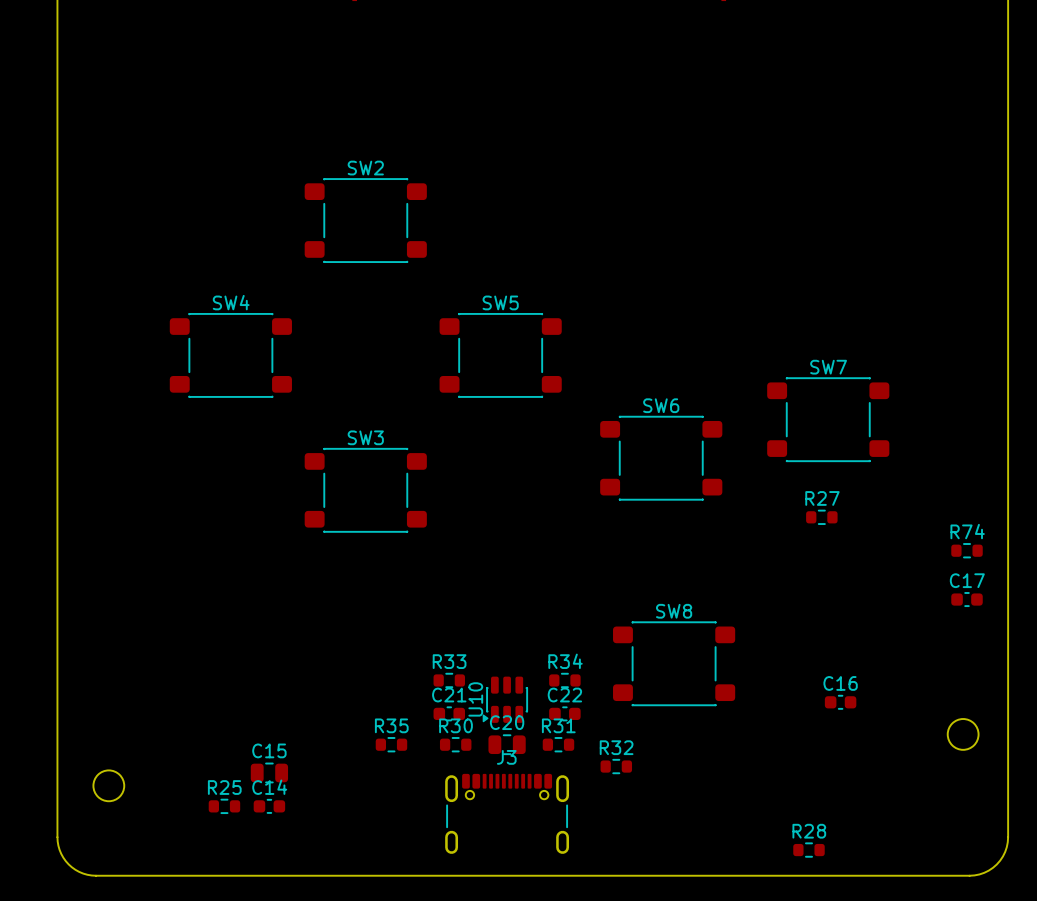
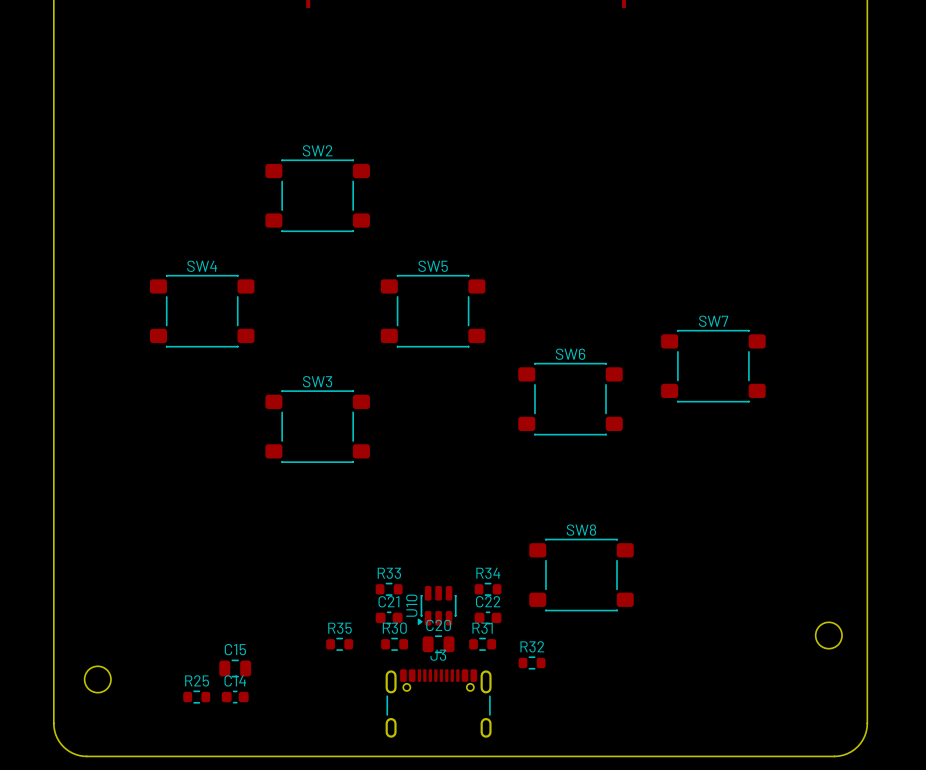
R27: (821, 517) -> none
R74: (967, 550) -> none
C17: (967, 599) -> none
C16: (840, 702) -> none
R28: (808, 850) -> none

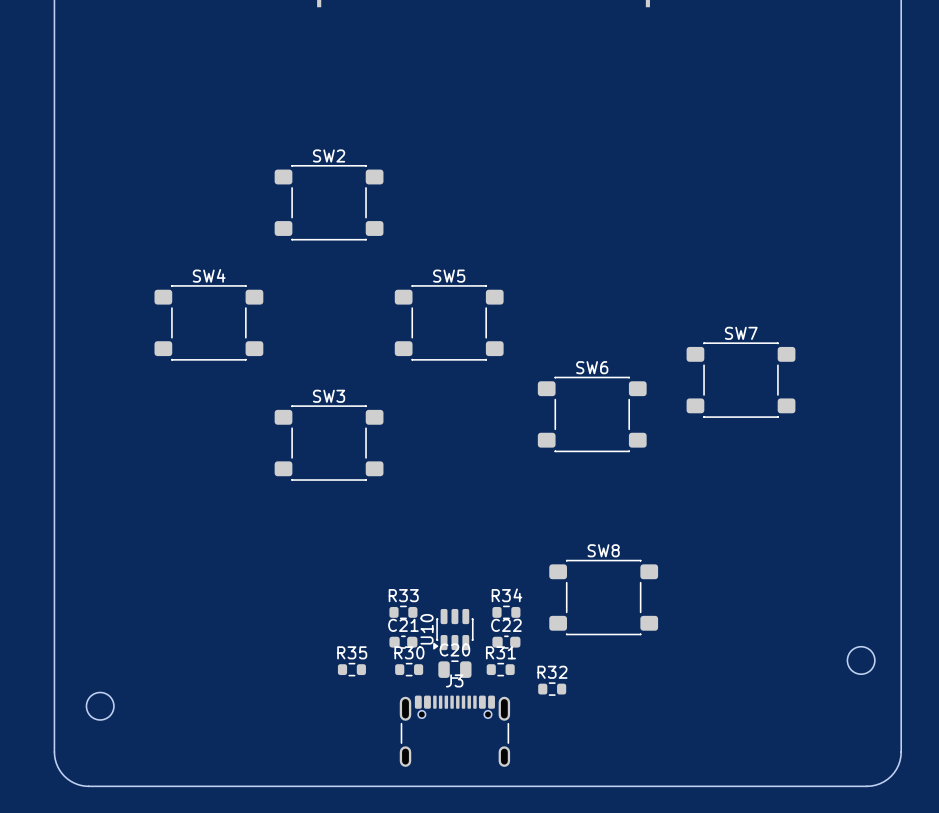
C15: (235, 668) -> none
R25: (196, 697) -> none
C14: (235, 697) -> none

